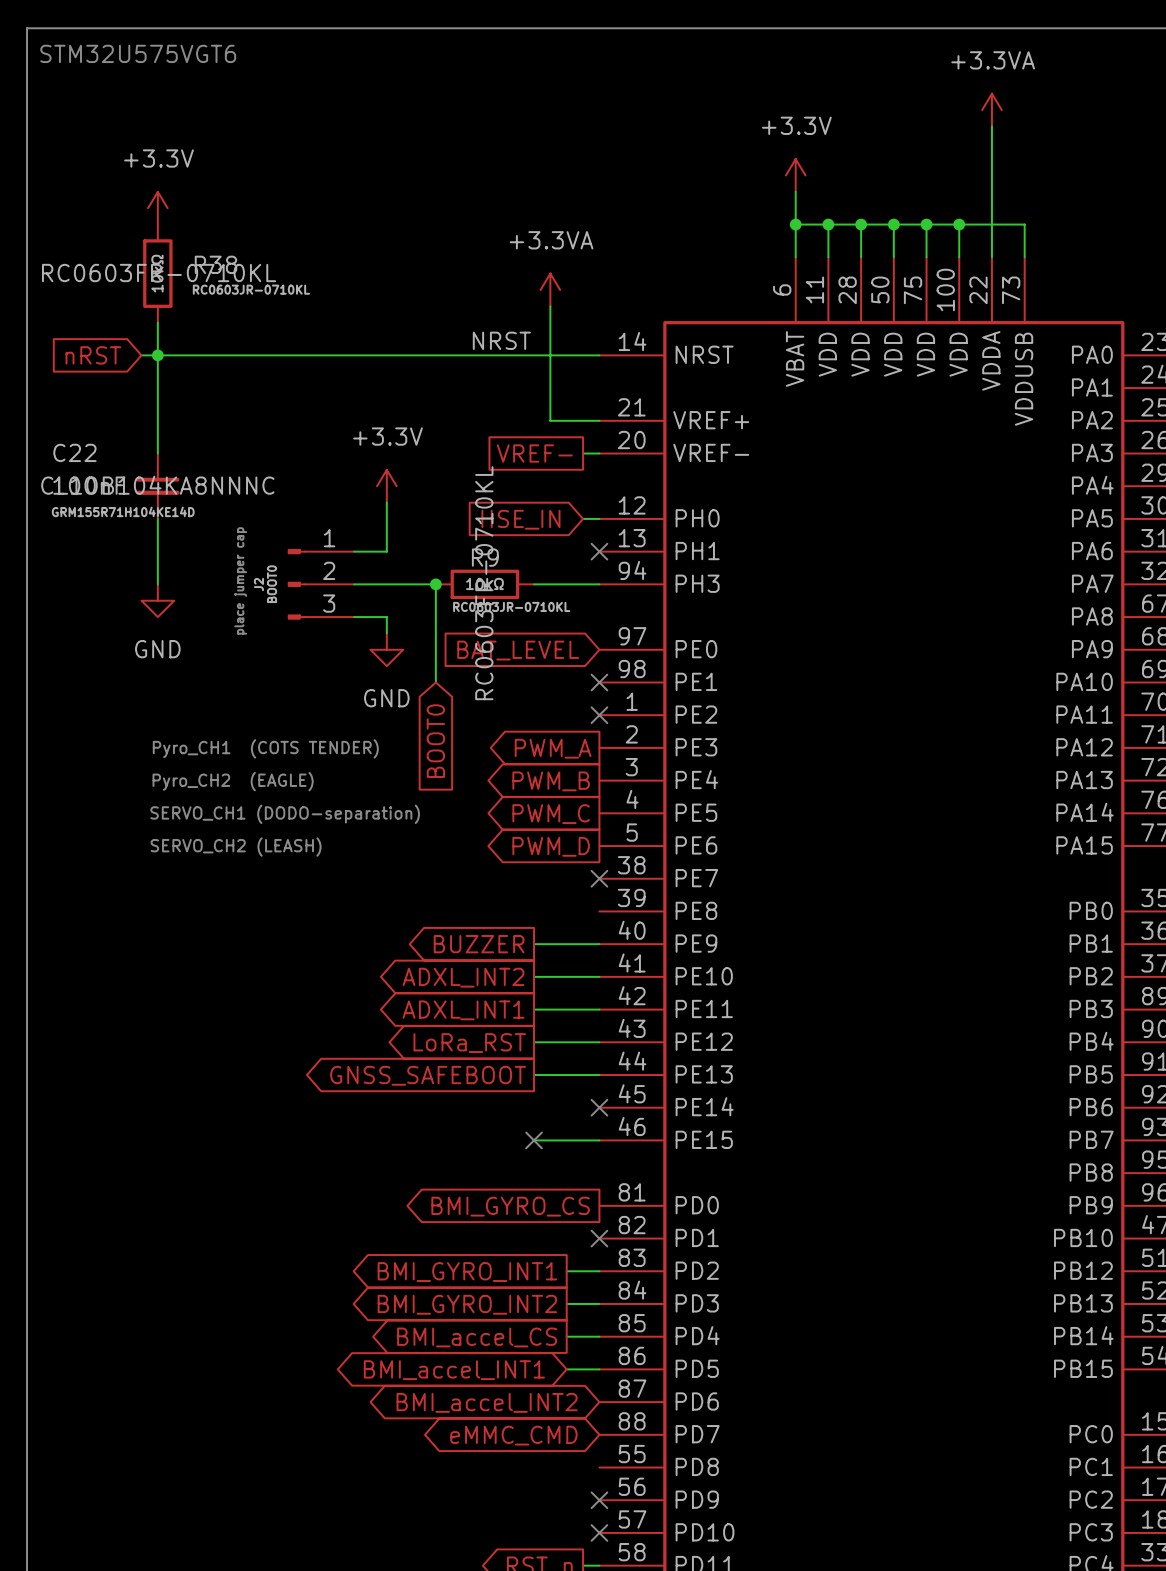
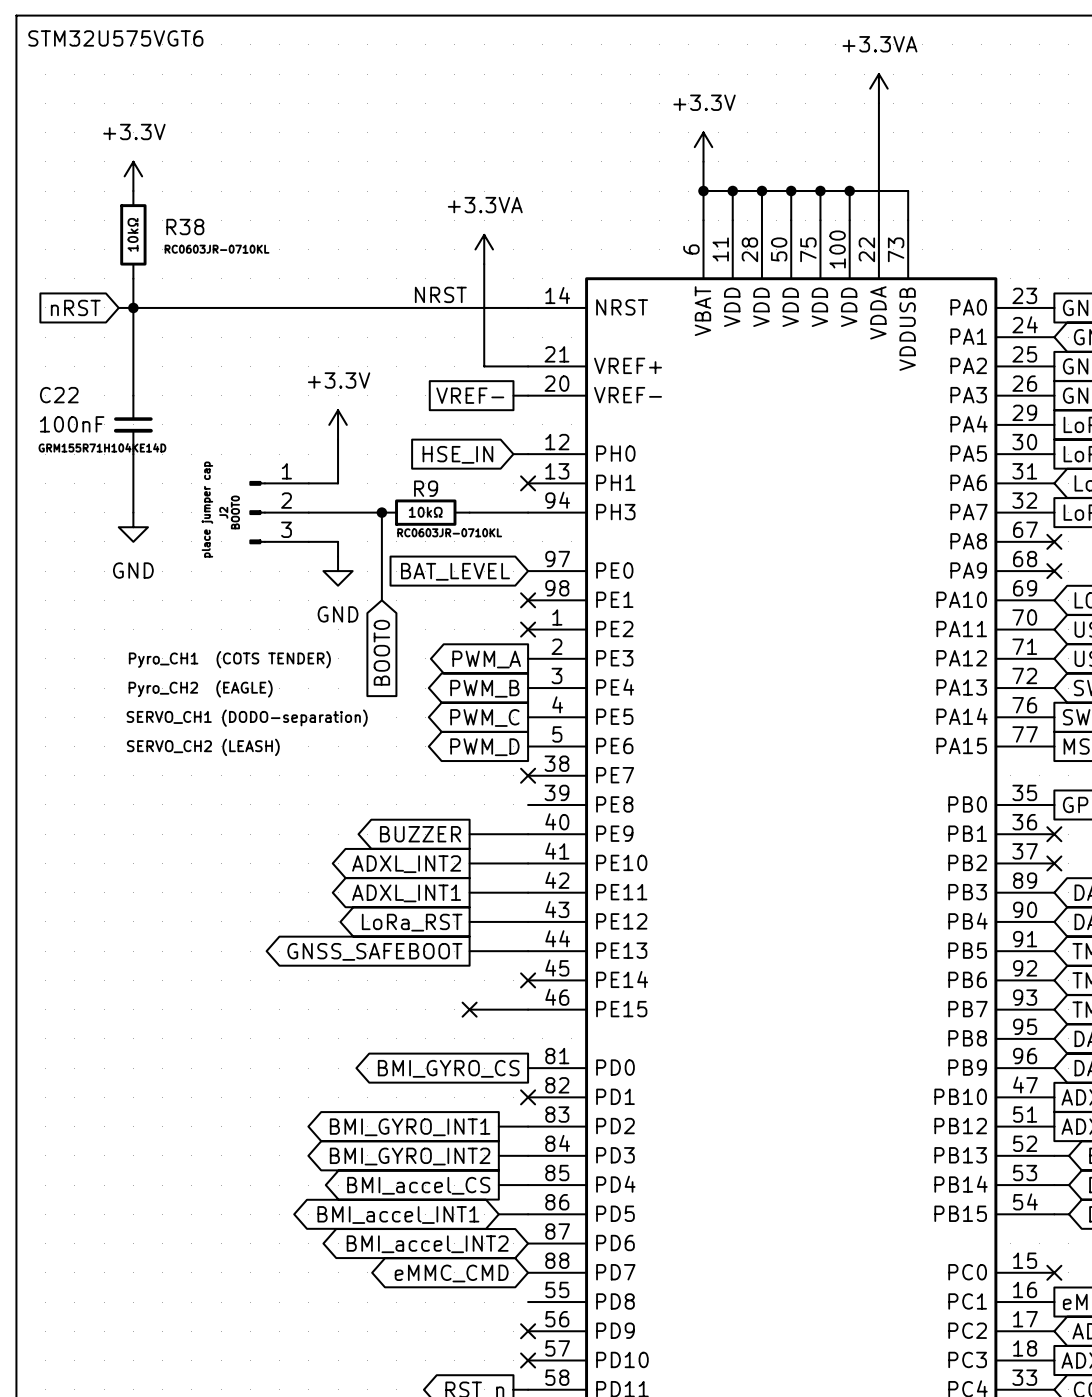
R38 text: RC0603FR-0710KL (159, 273) -> none
C22 text: CL10B104KA8NNNC (157, 485) -> none
R9 text: RC0603FR-0710KL (484, 583) -> none

